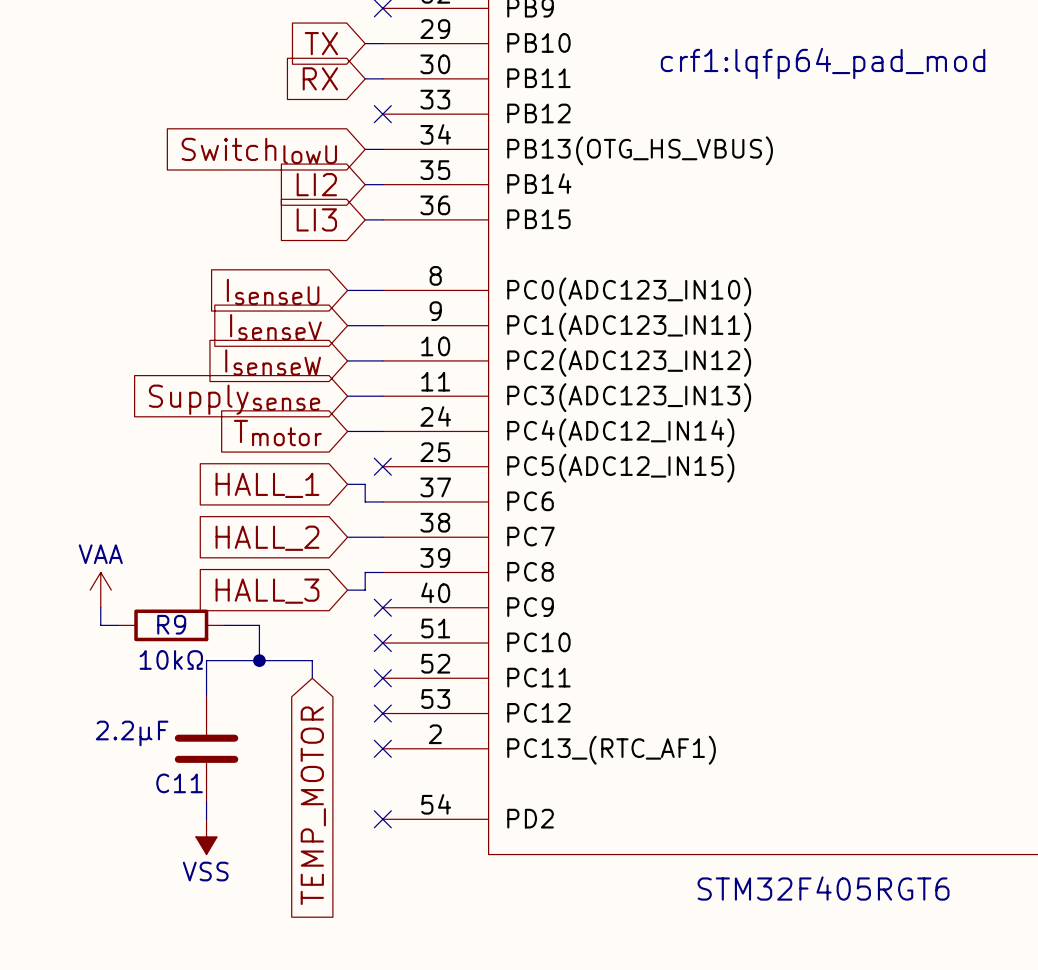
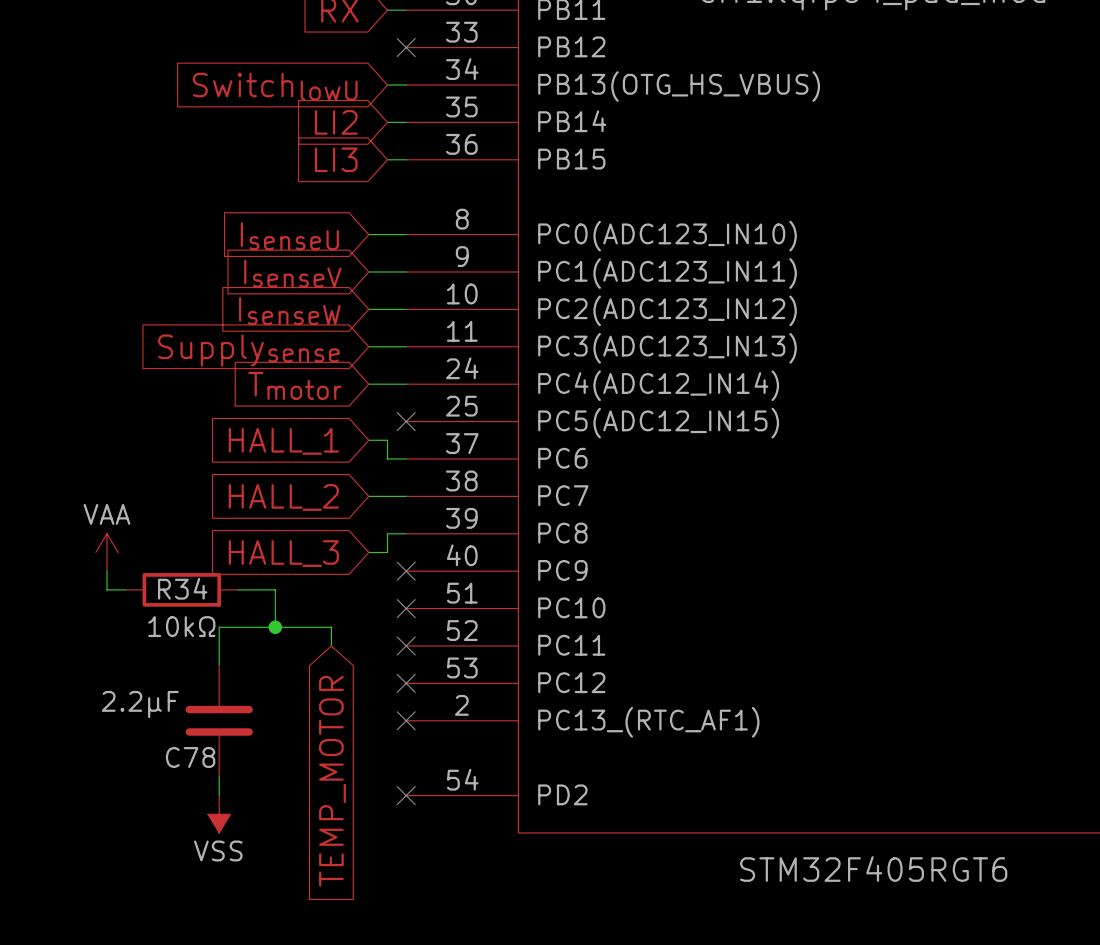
R9 name: R9 (171, 624) -> R34 (182, 588)
C11 name: C11 (179, 783) -> C78 (190, 757)

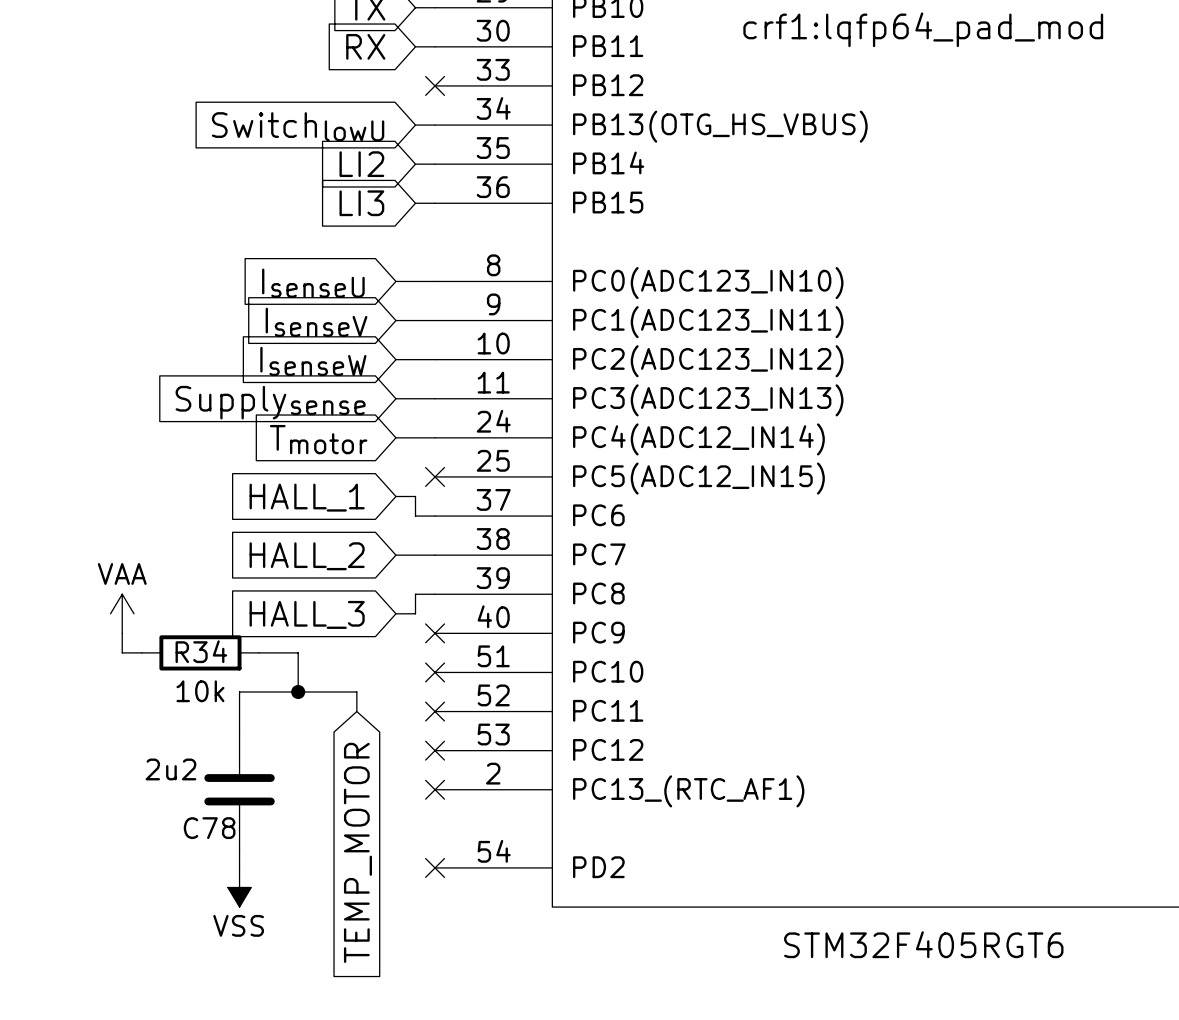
R34 value: 10kΩ (181, 626) -> 10k (200, 691)
C78 value: 2.2µF (140, 704) -> 2u2 (170, 769)

